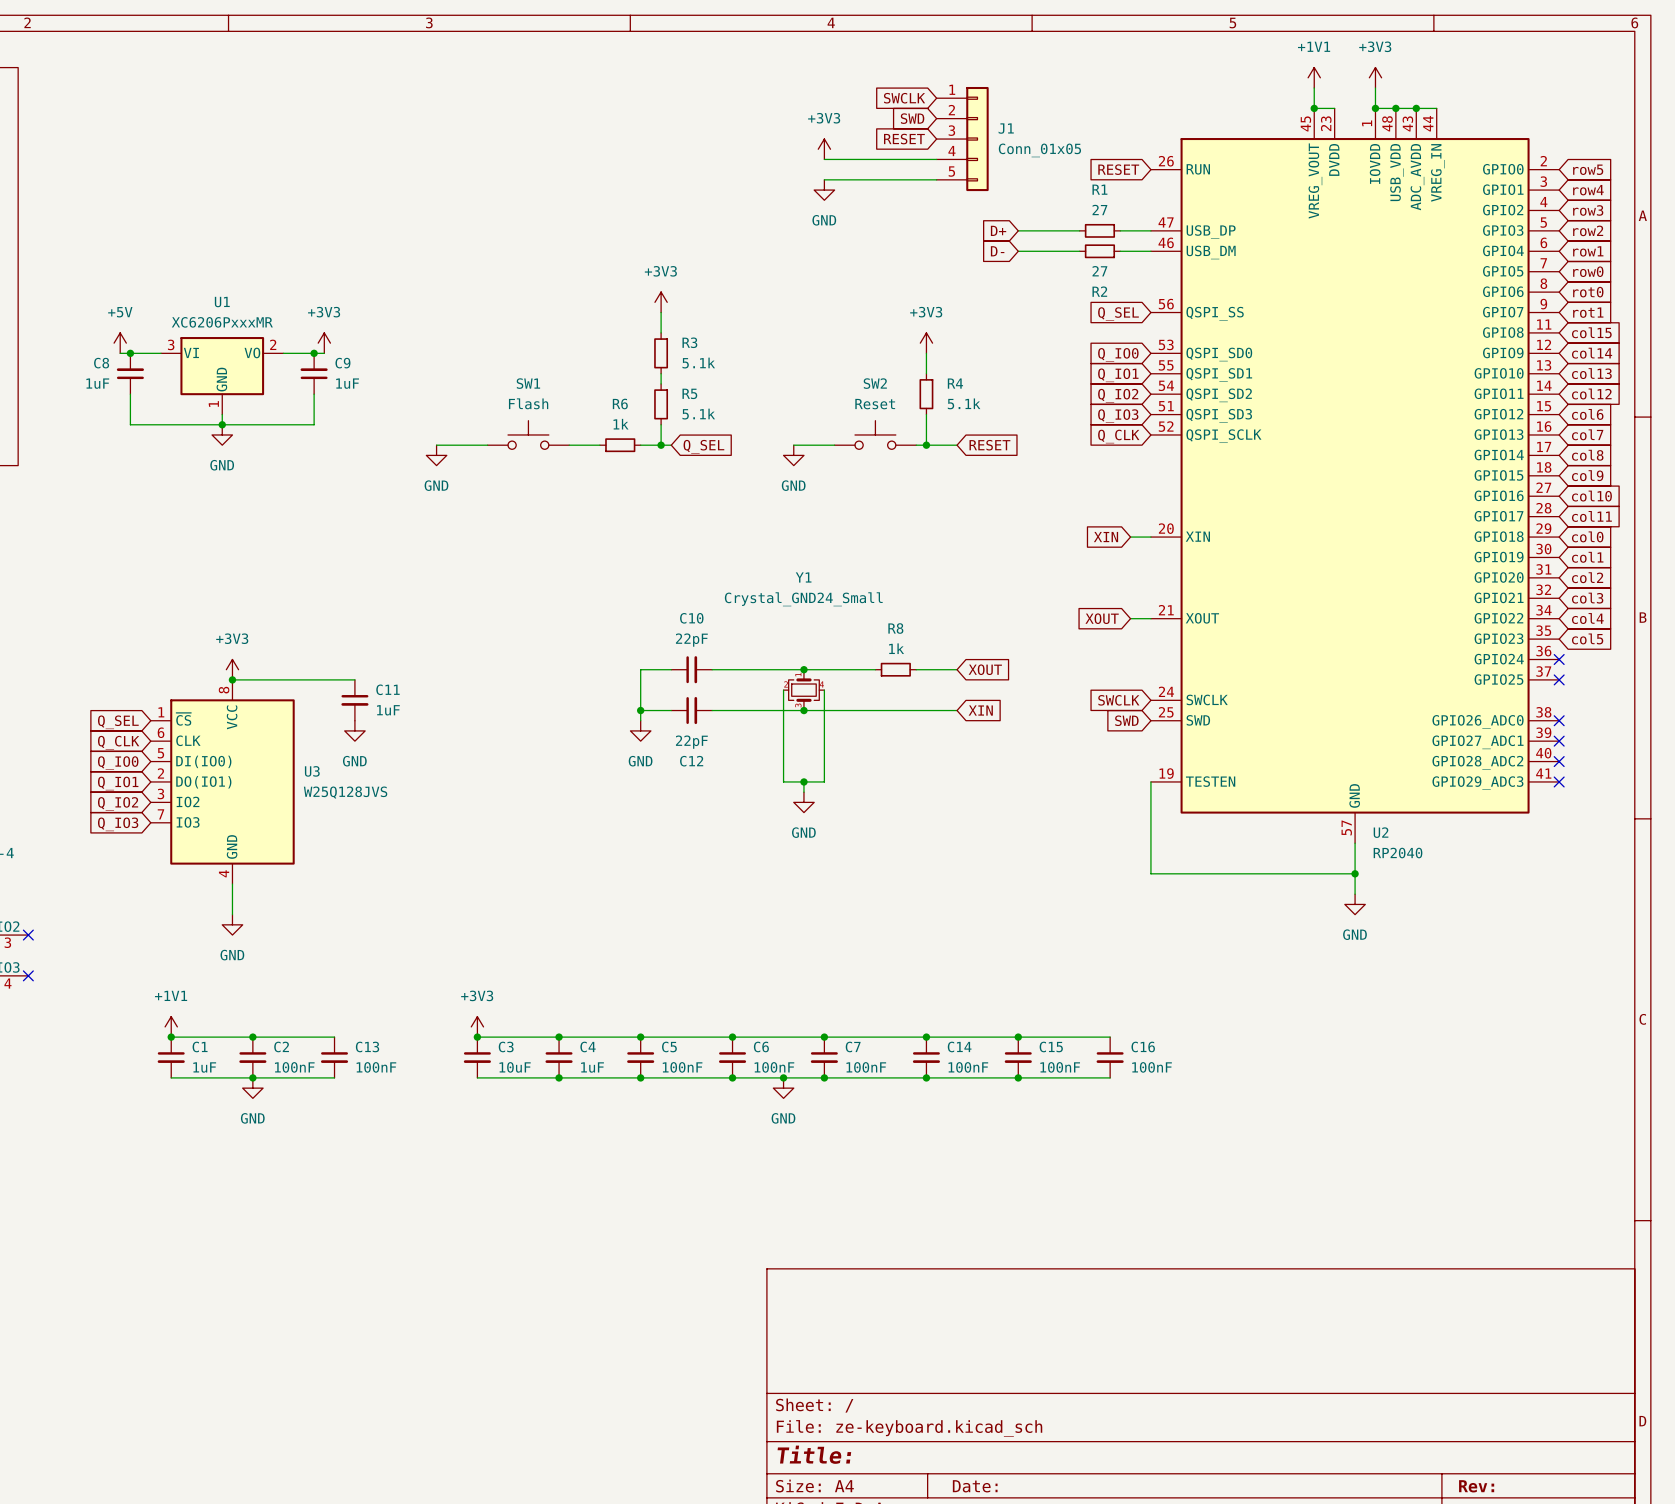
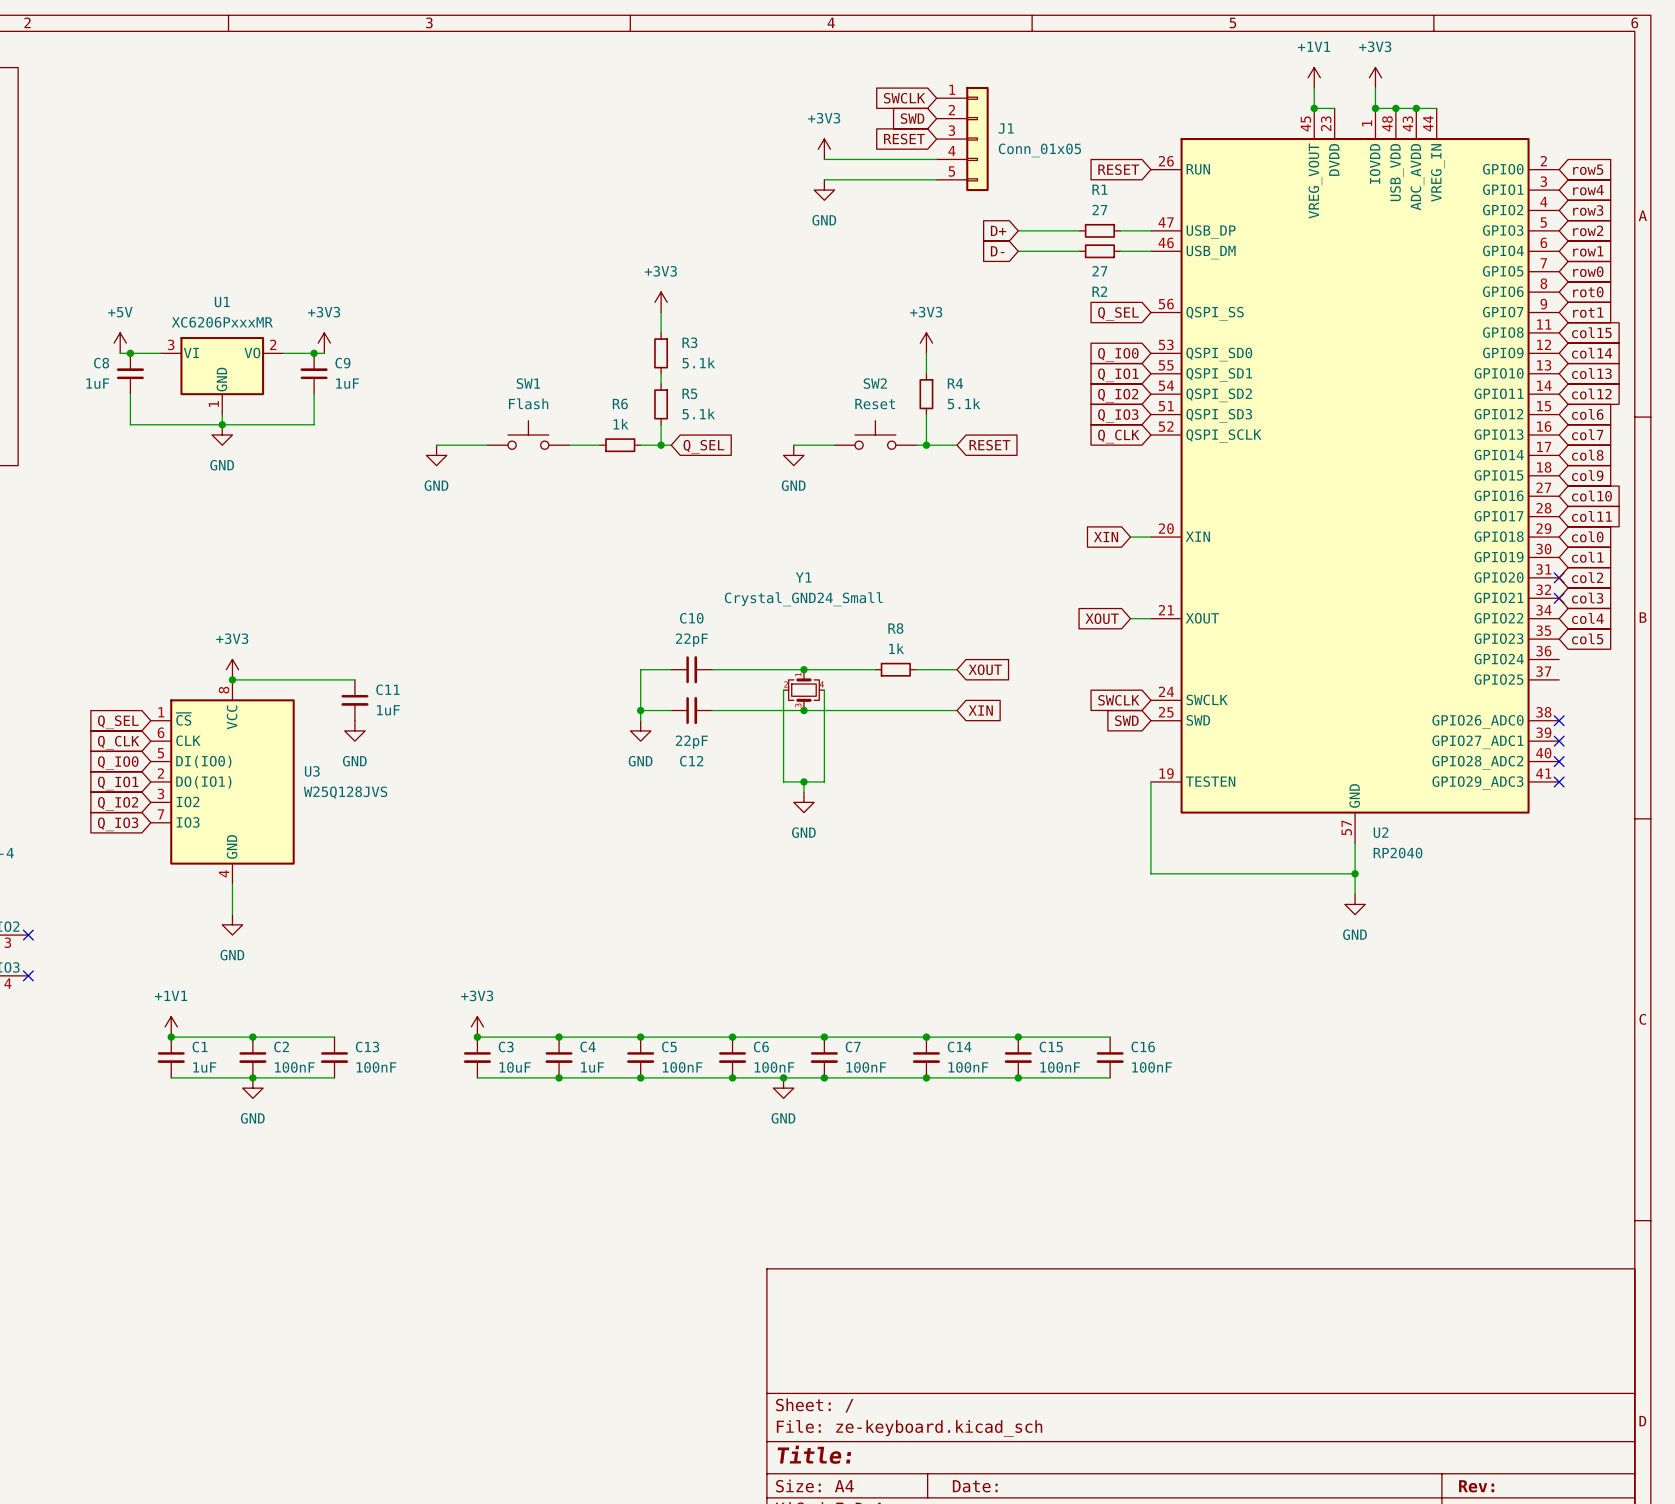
no-connect mark: none -> (1559, 577)
no-connect mark: none -> (1559, 598)
no-connect mark: (1559, 659) -> none
no-connect mark: (1559, 679) -> none

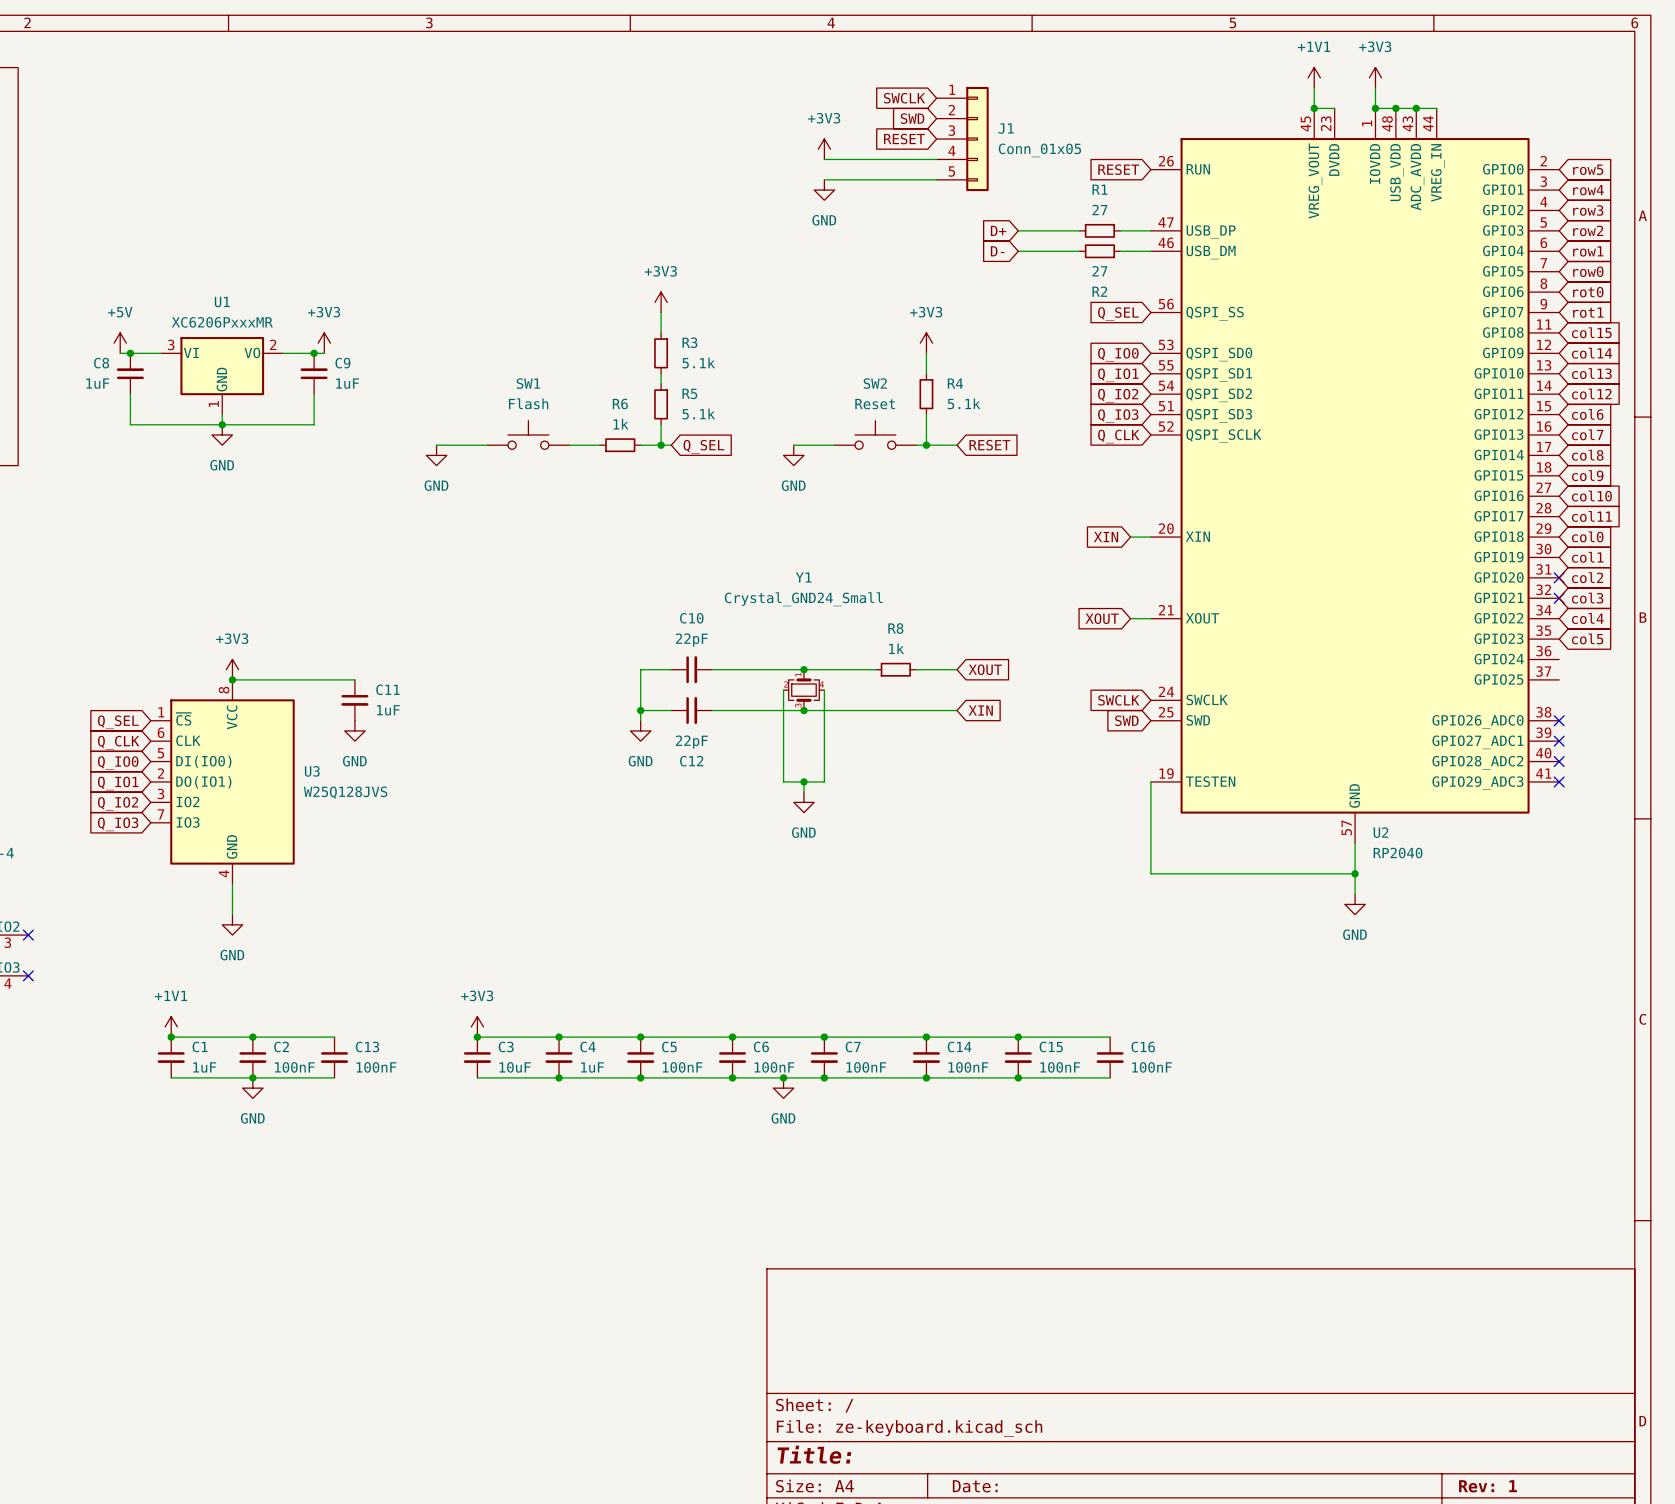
title block: Rev: (1476, 1486) -> Rev: 1 (1488, 1486)

